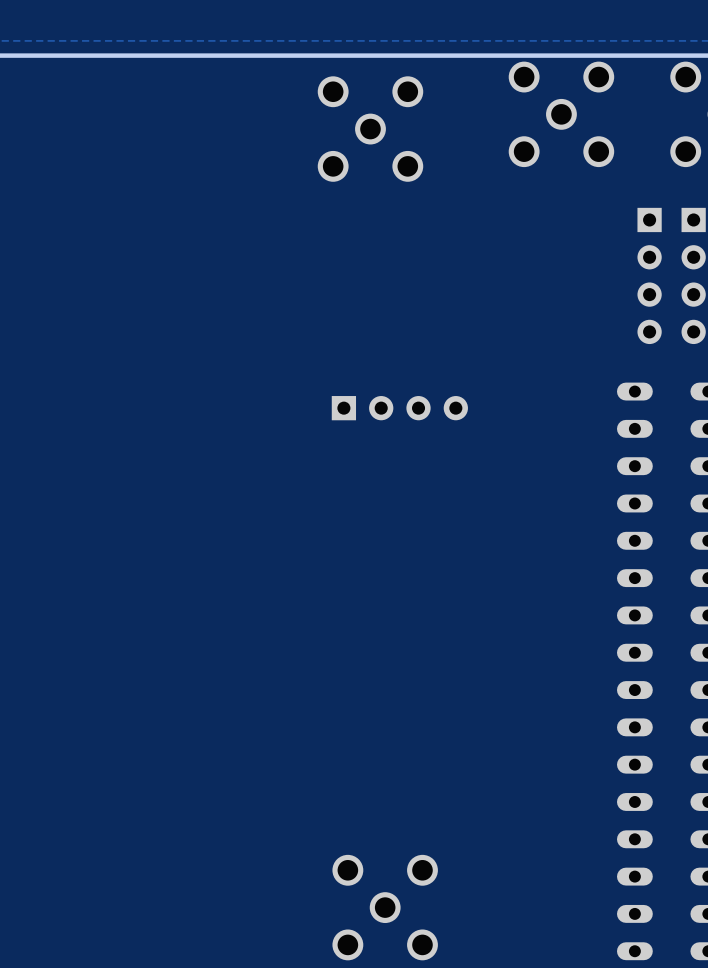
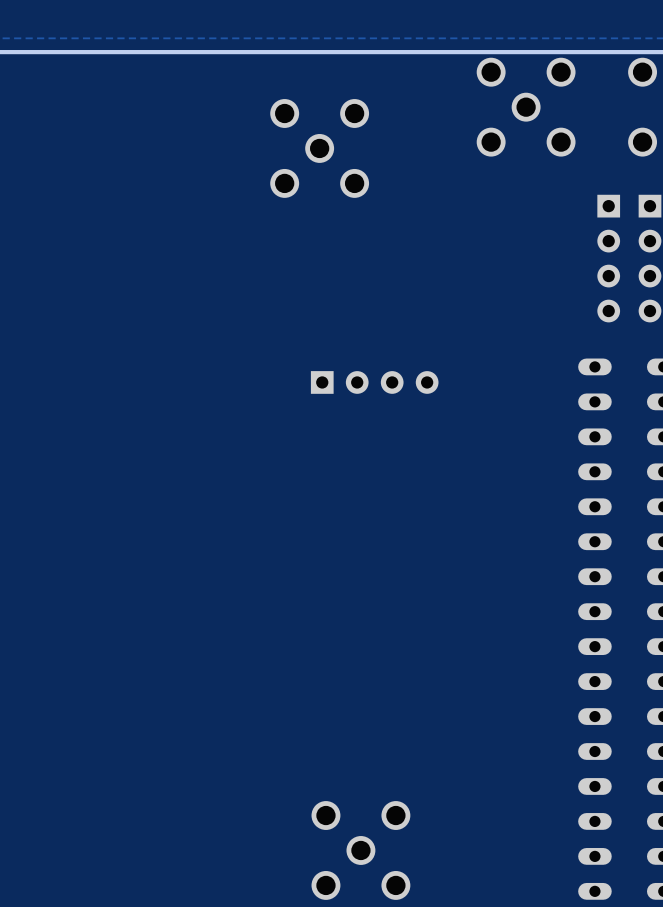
part position: (370, 129) -> (319, 148)

